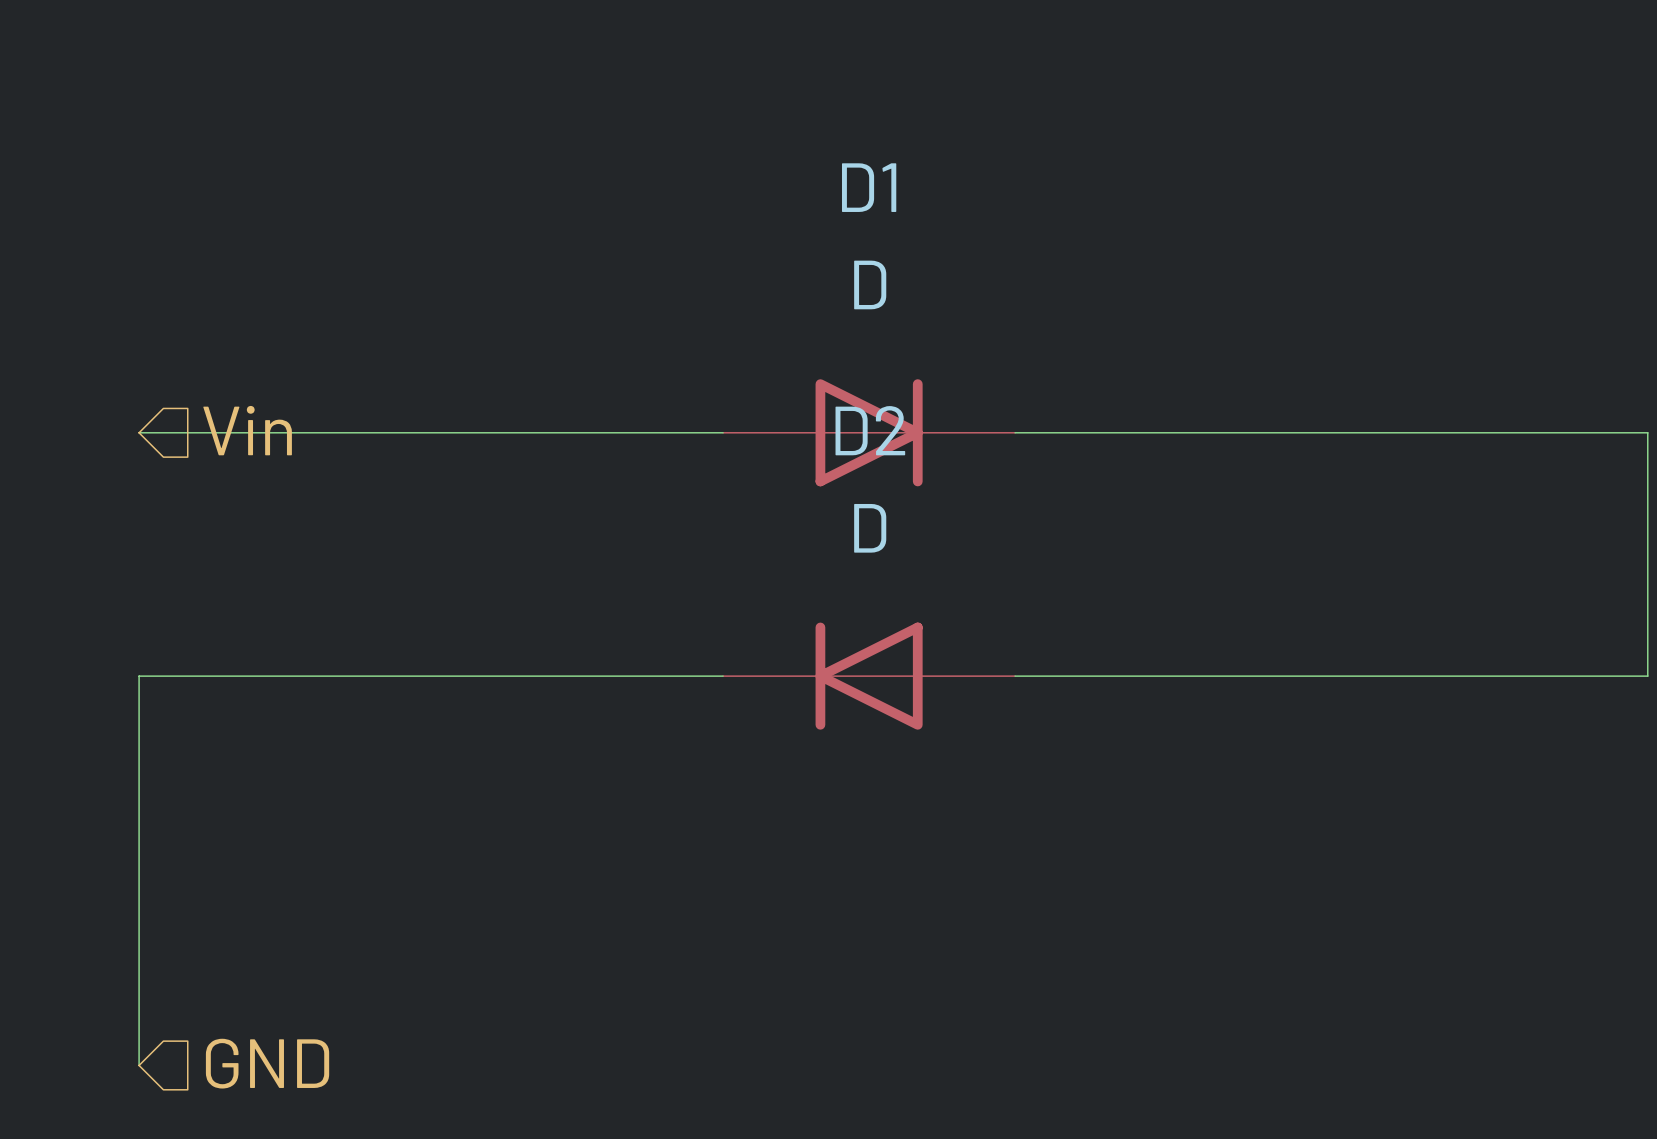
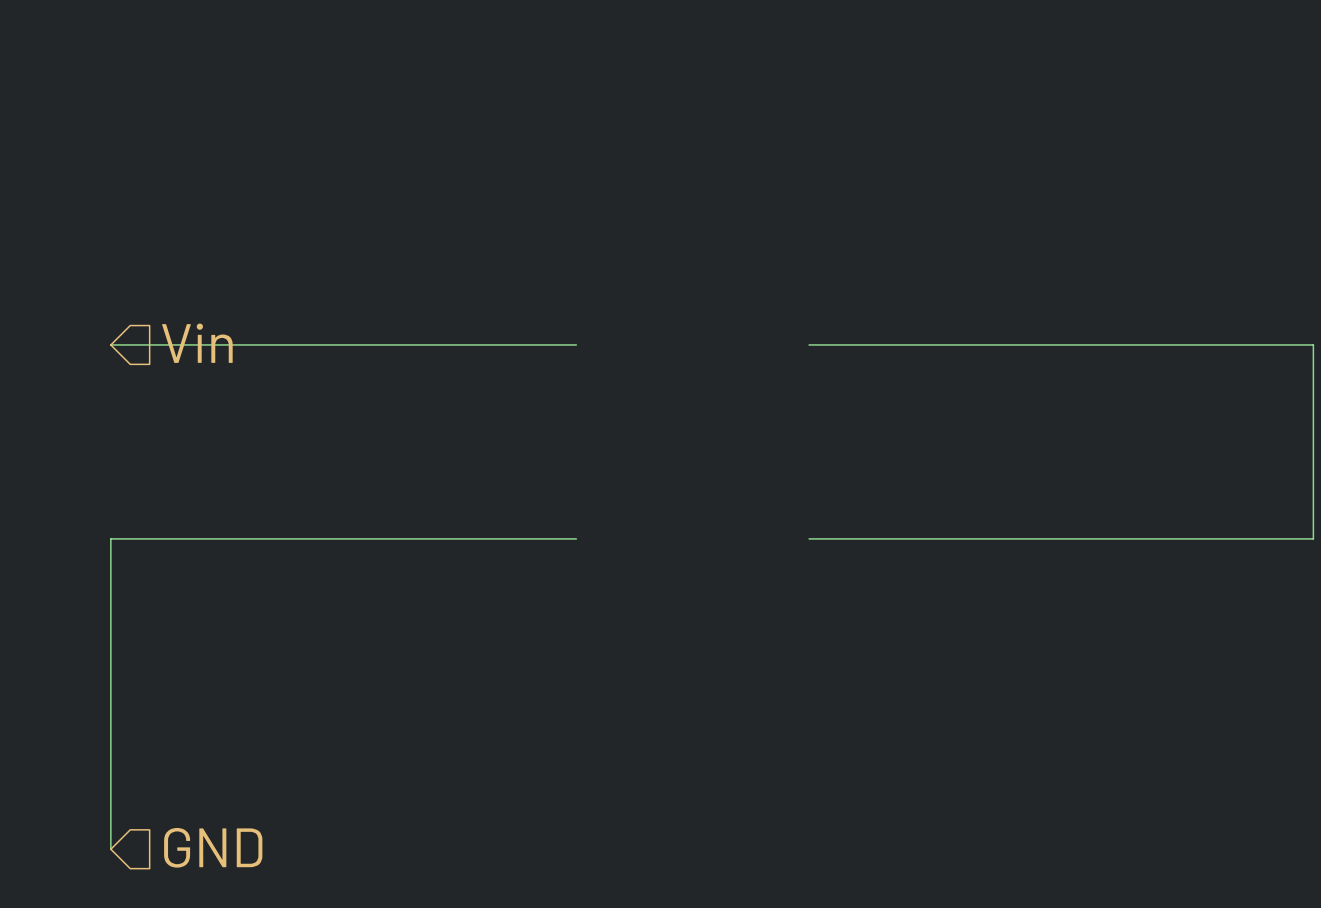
D1: D (869, 432) -> none
D2: D (869, 676) -> none

